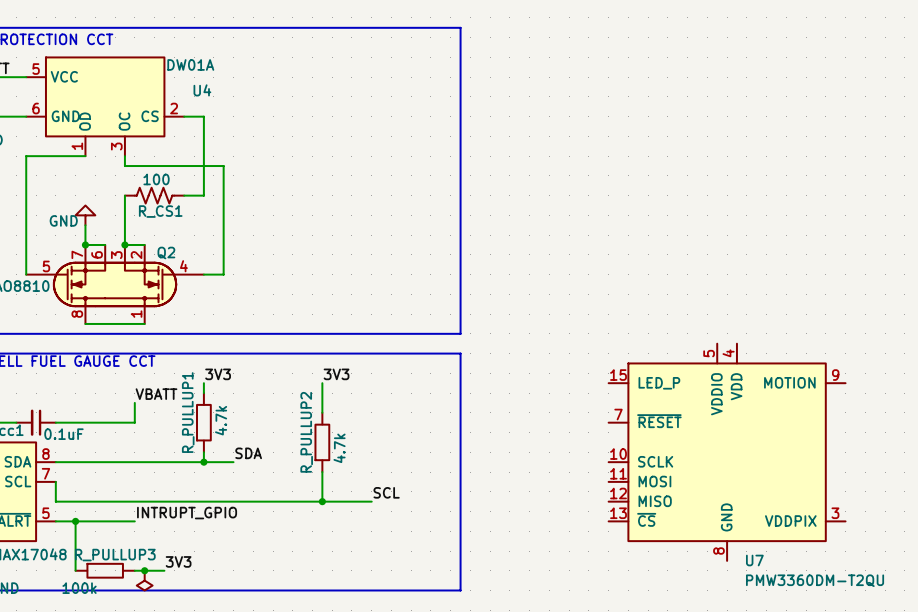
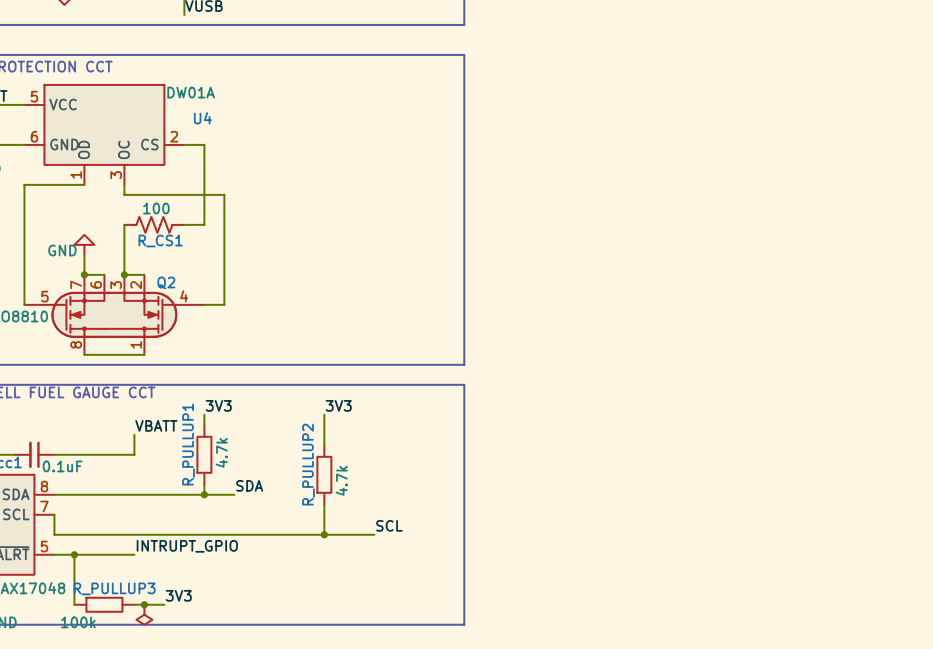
U7: PMW3360DM-T2QU (727, 452) -> none

